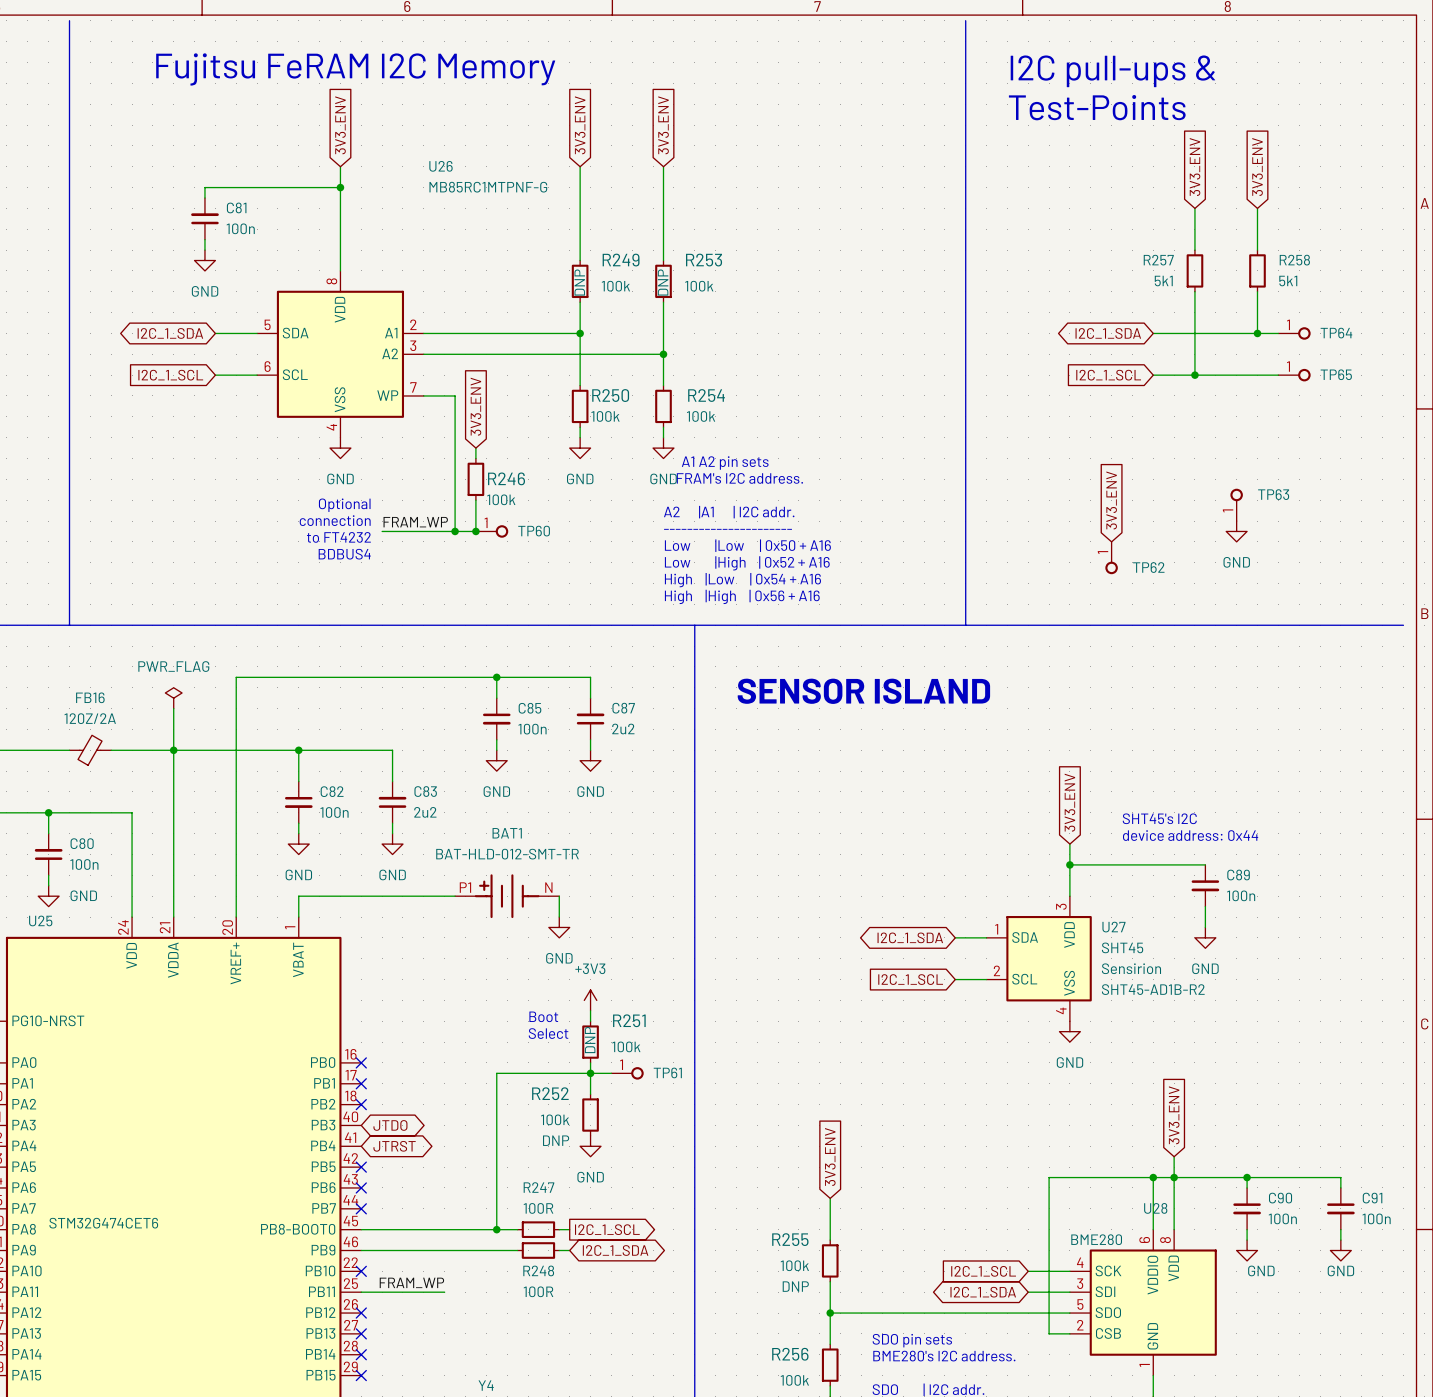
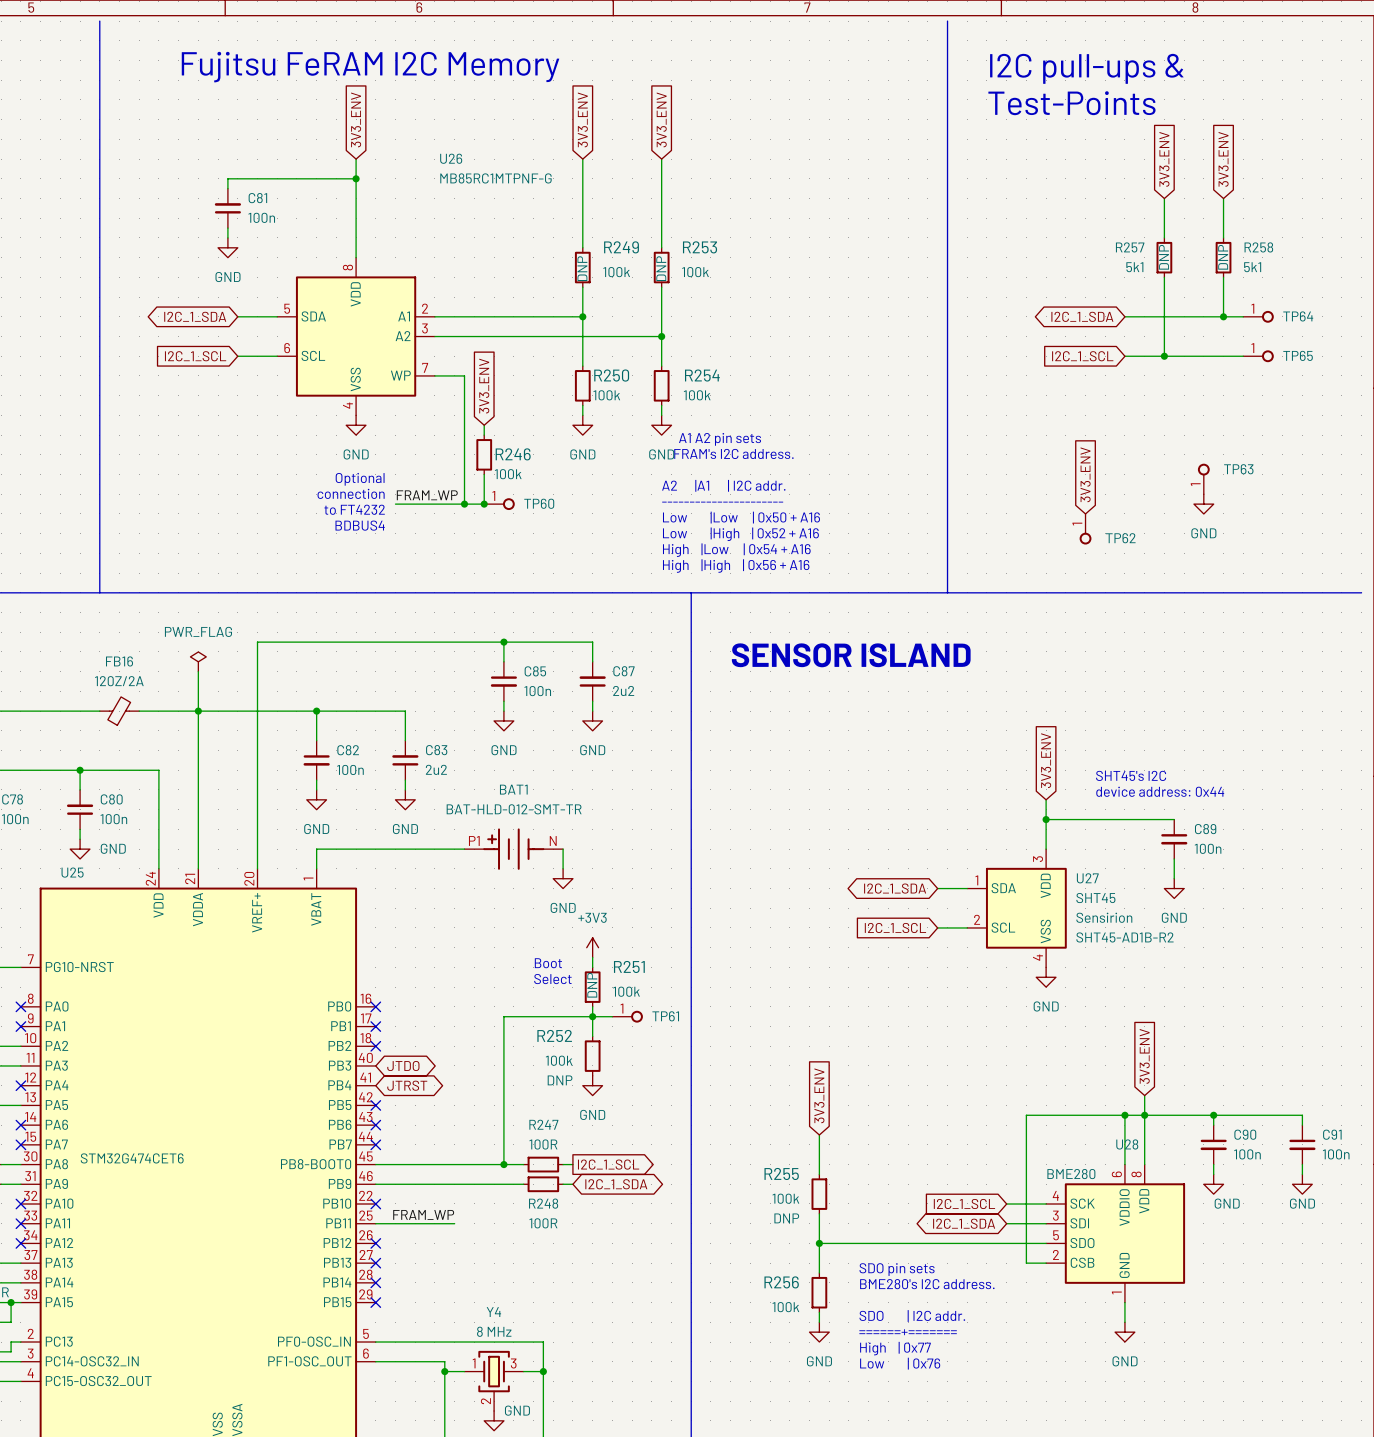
R257 text: none -> DNP (1164, 257)
R258 text: none -> DNP (1223, 257)

